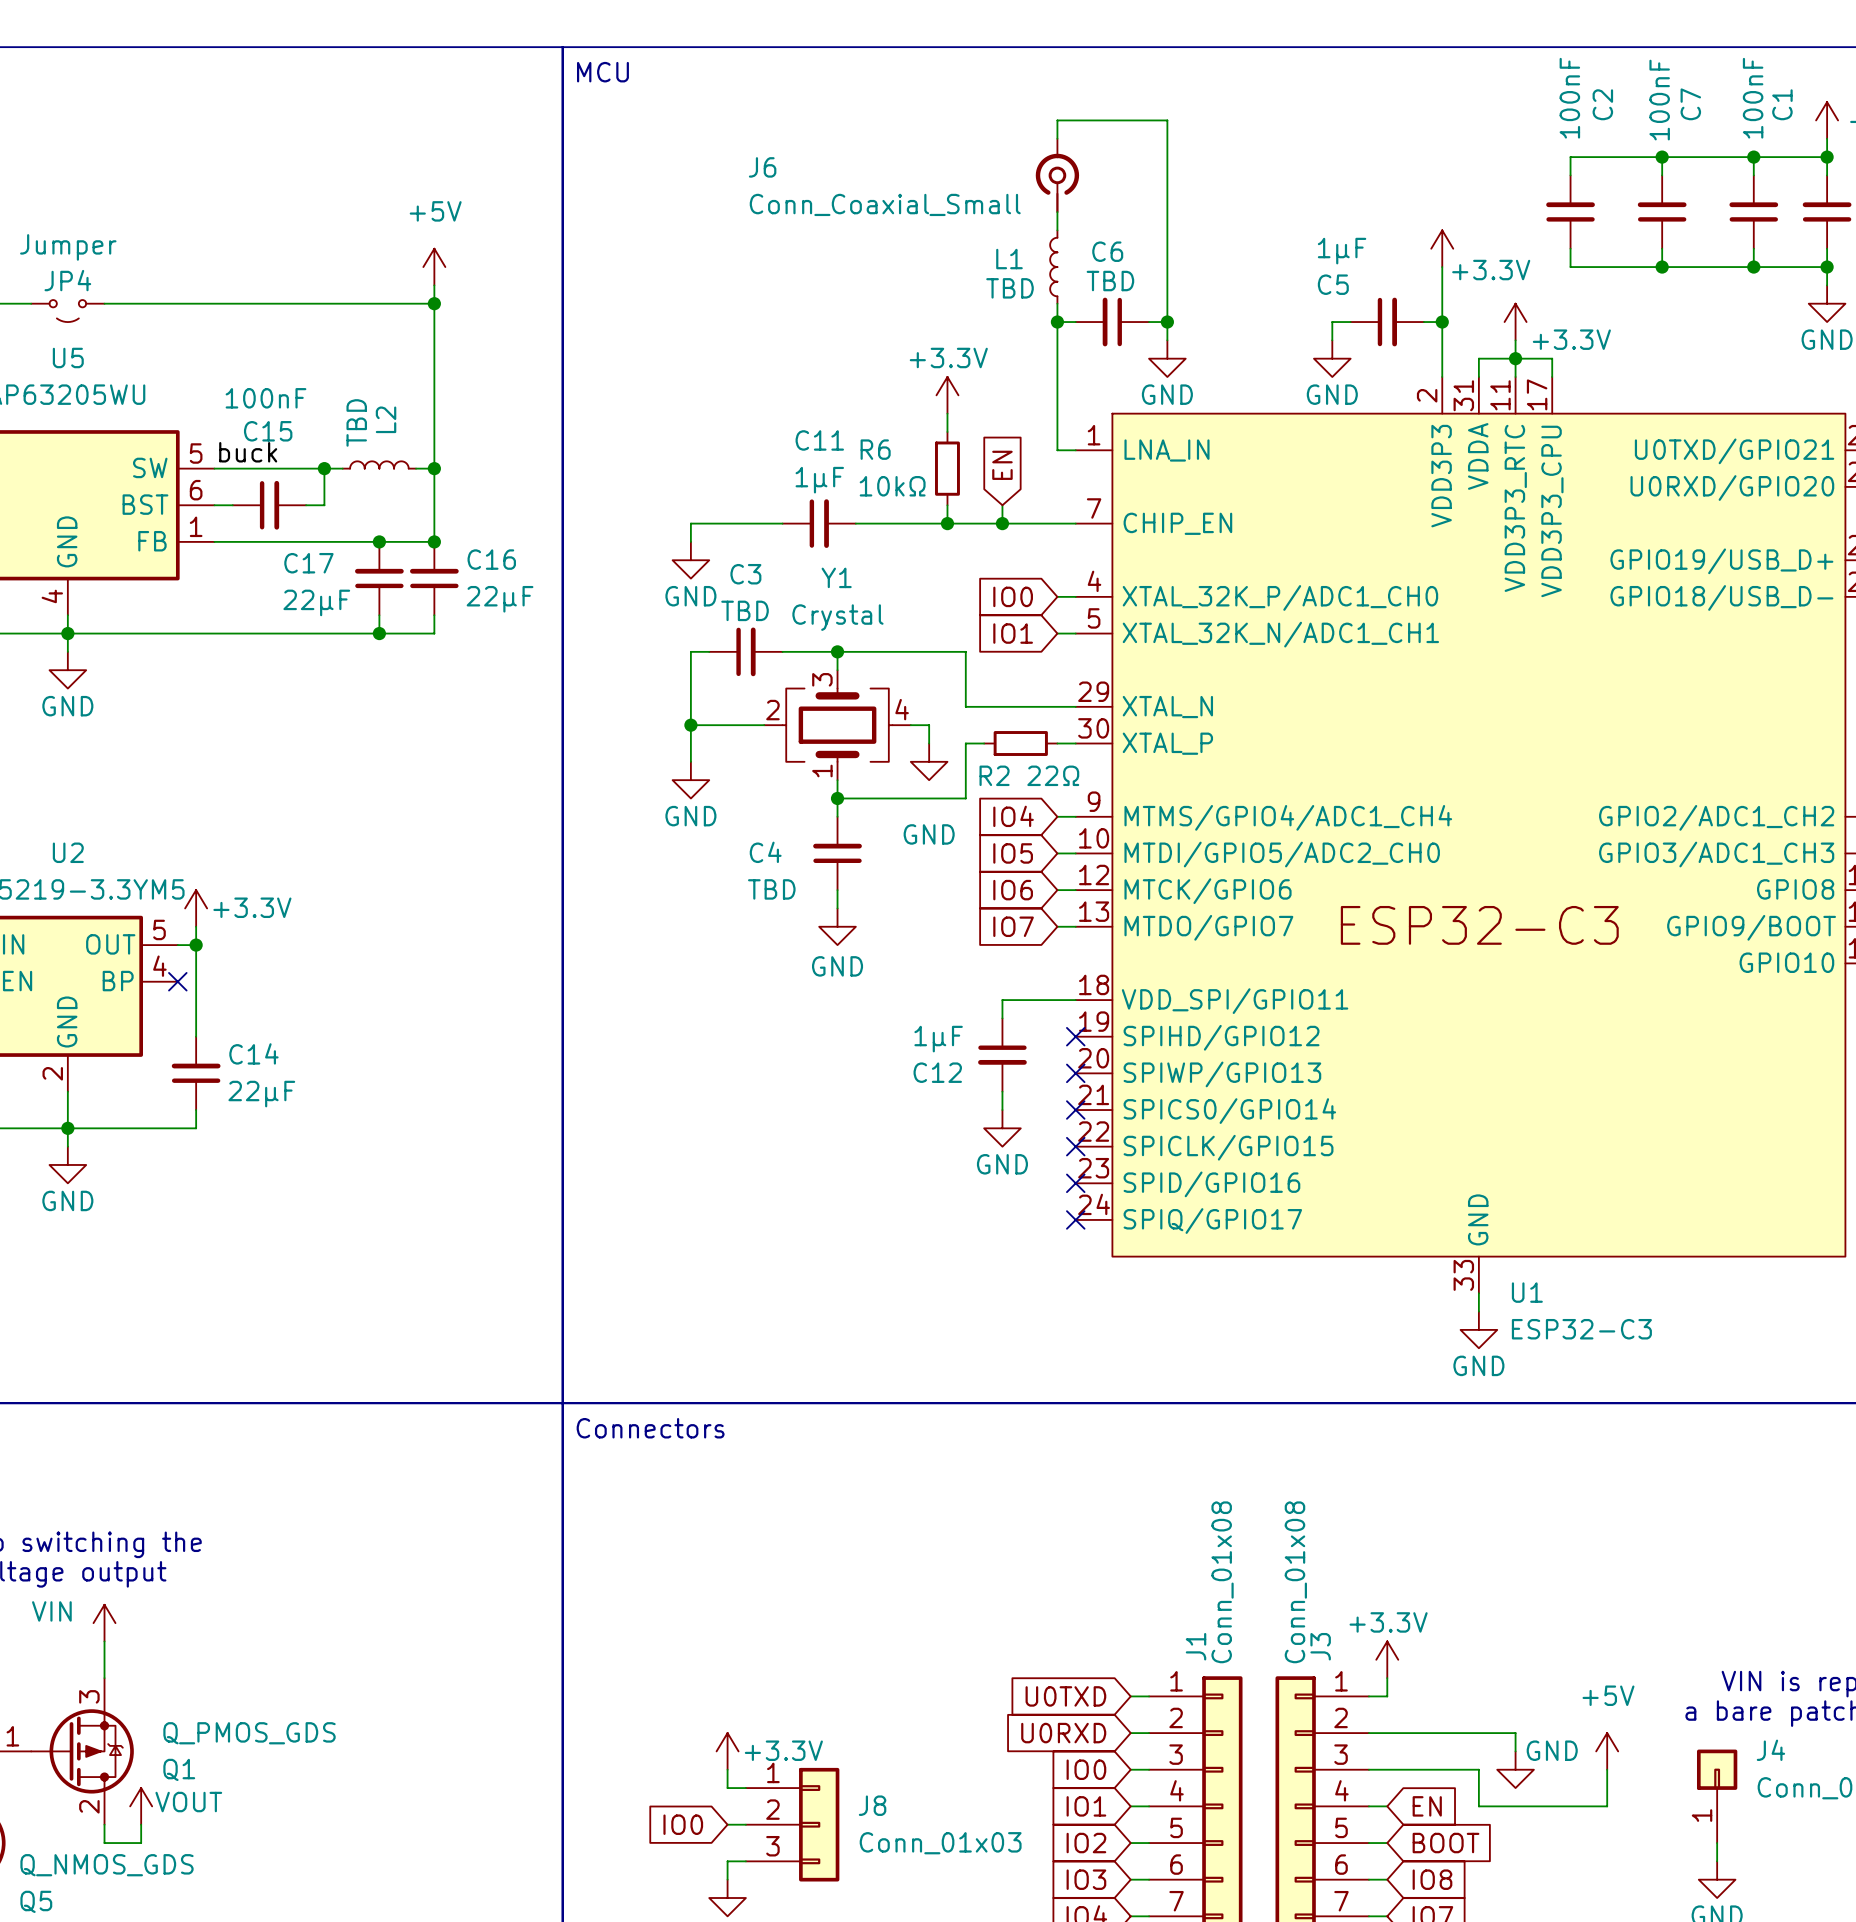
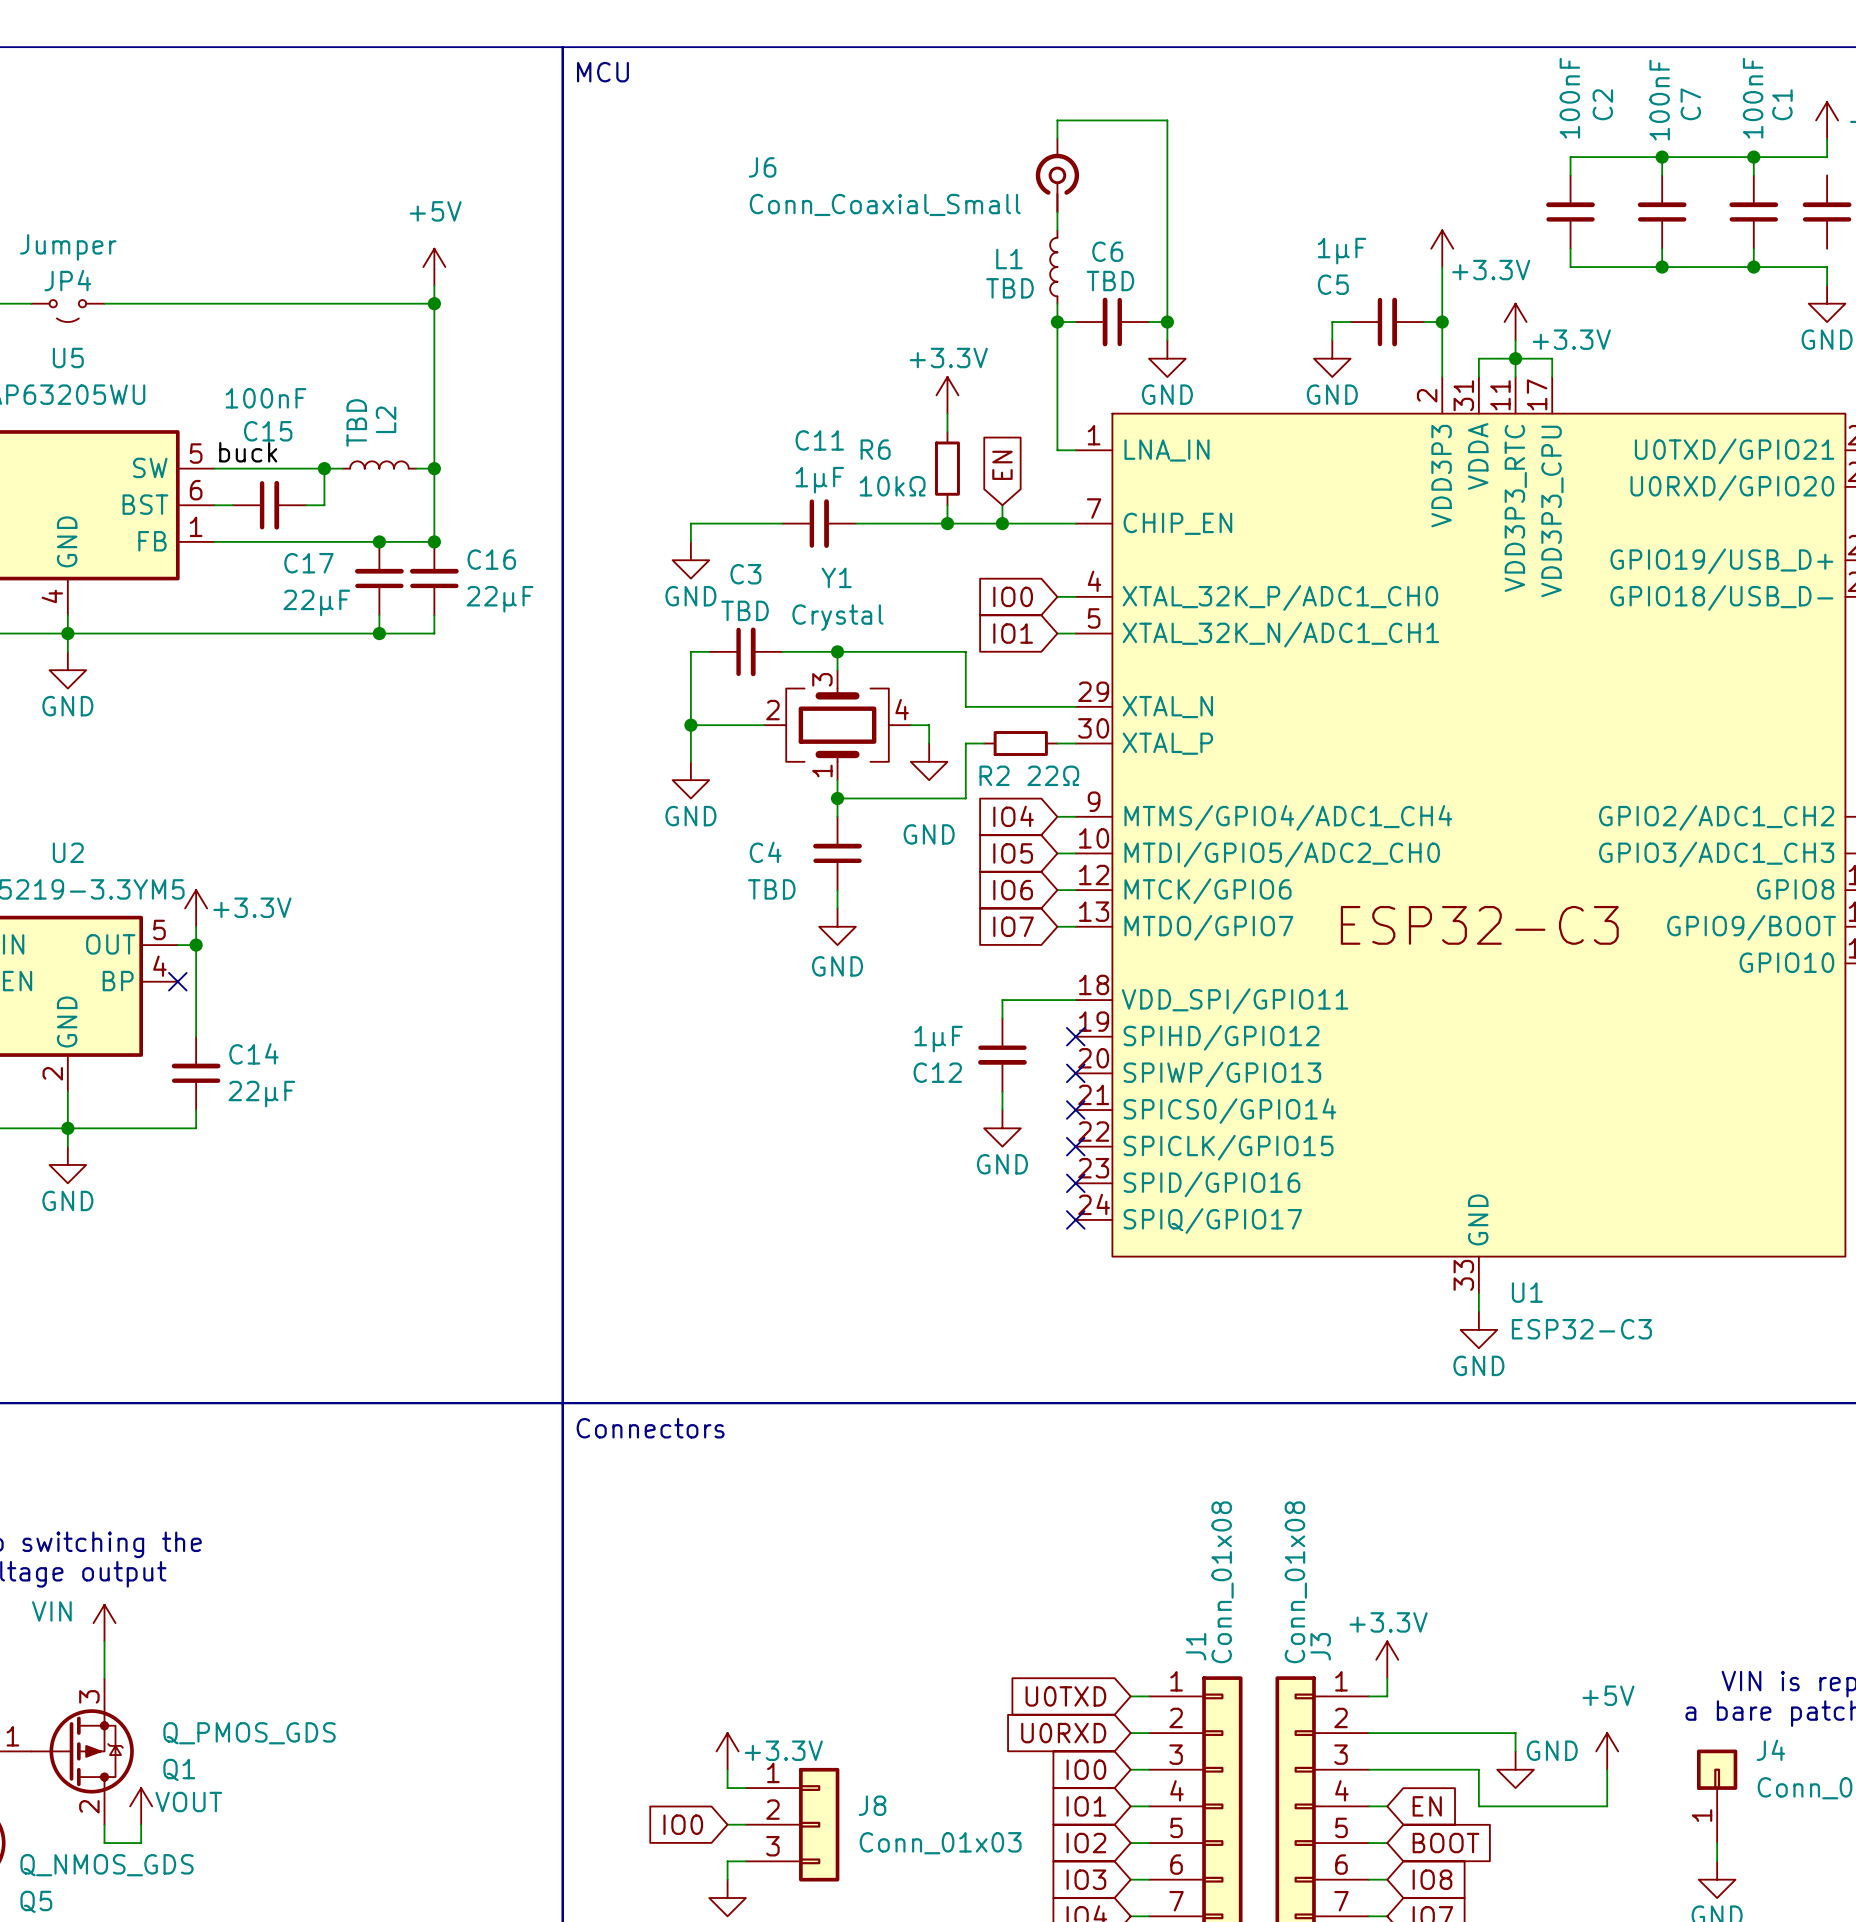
wire: (1827, 157) (1827, 175) -> none
junction: (1827, 157) -> none
wire: (1827, 248) (1827, 267) -> none
junction: (1827, 267) -> none

